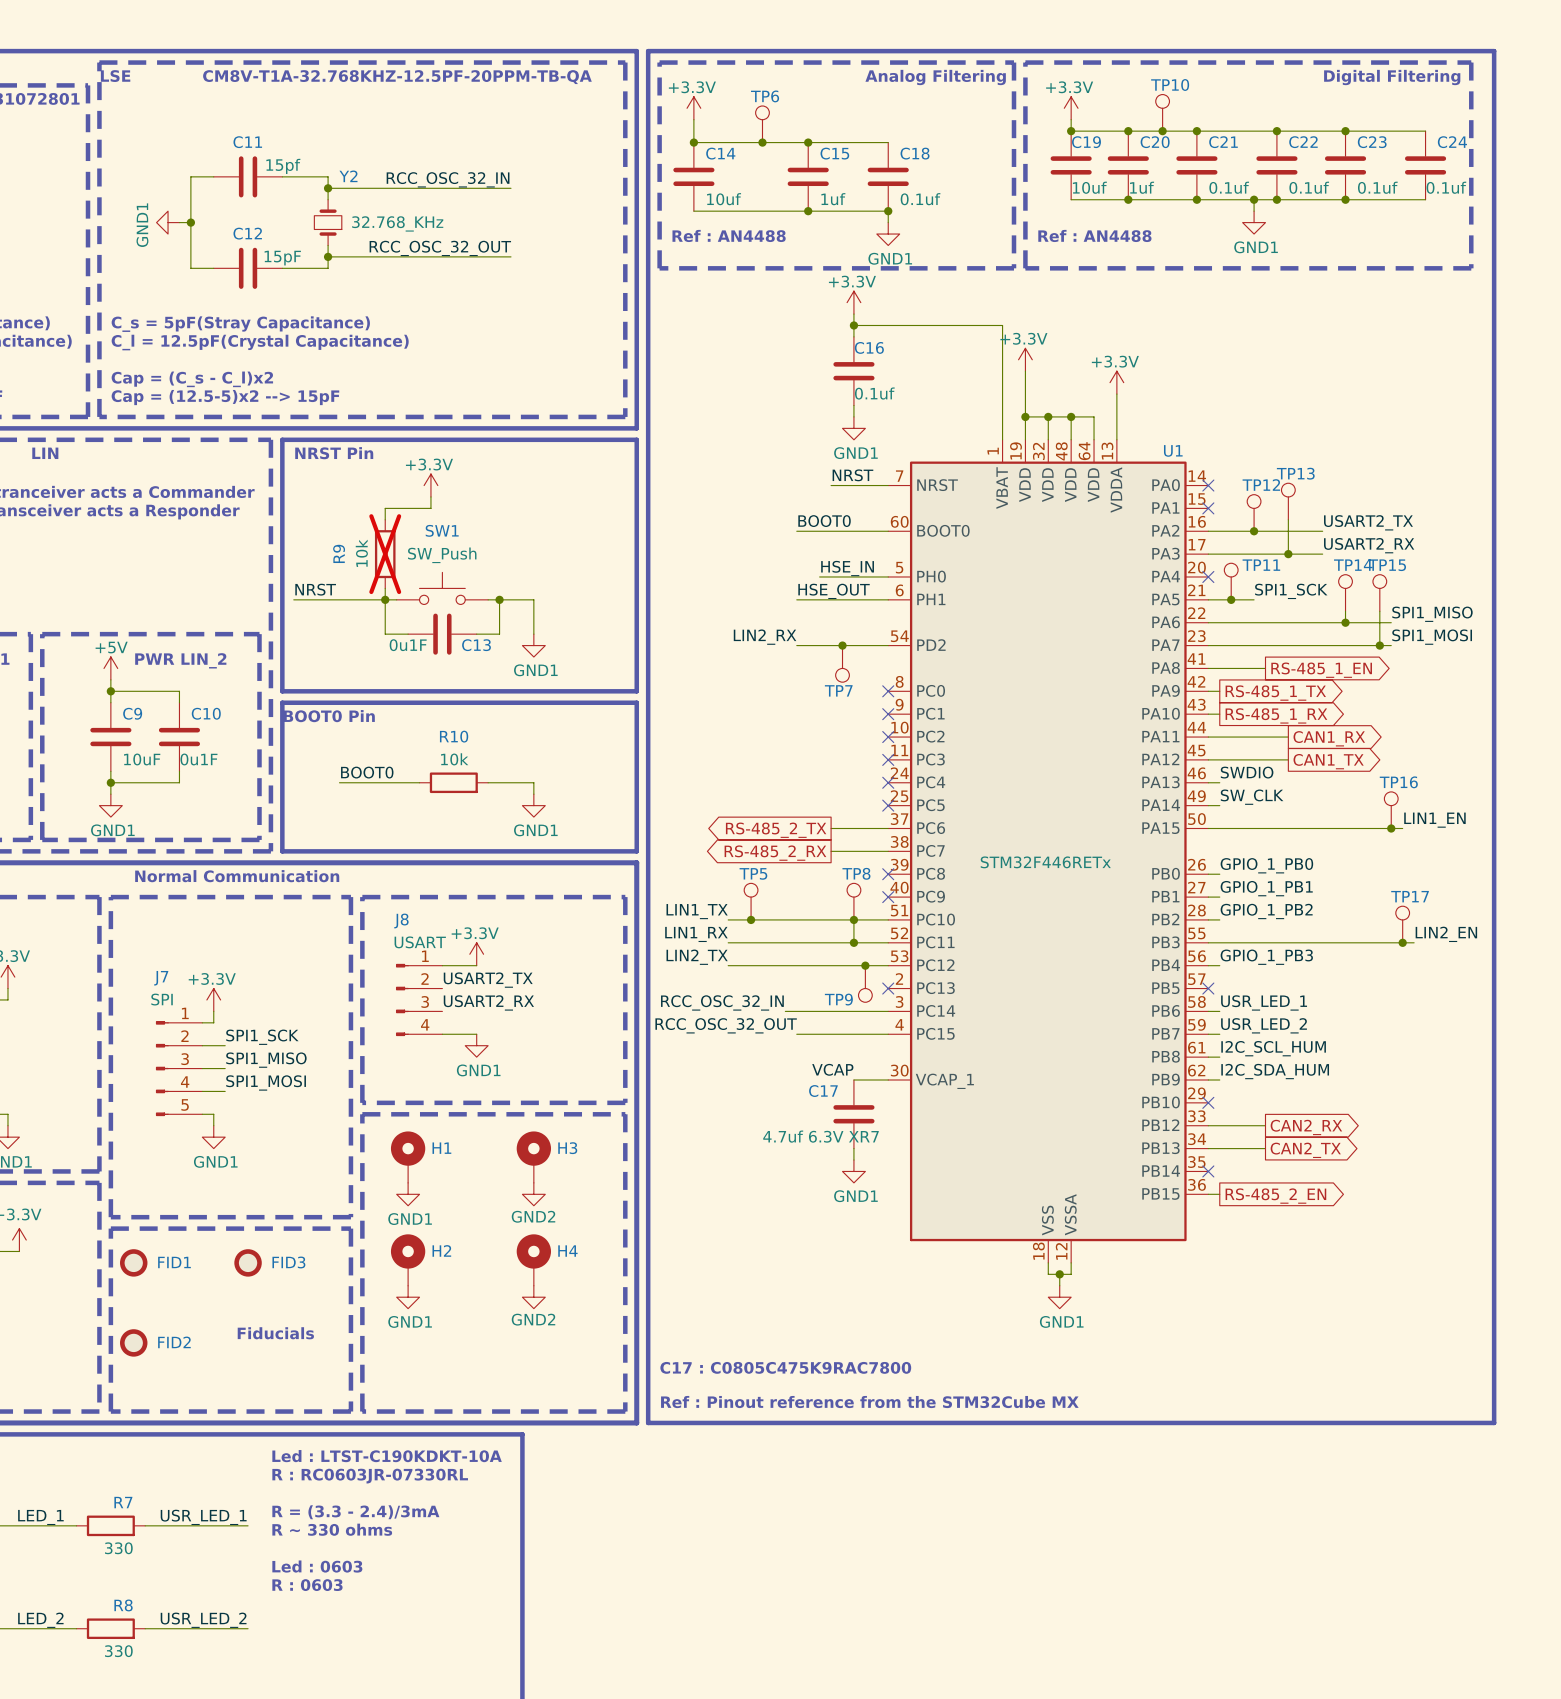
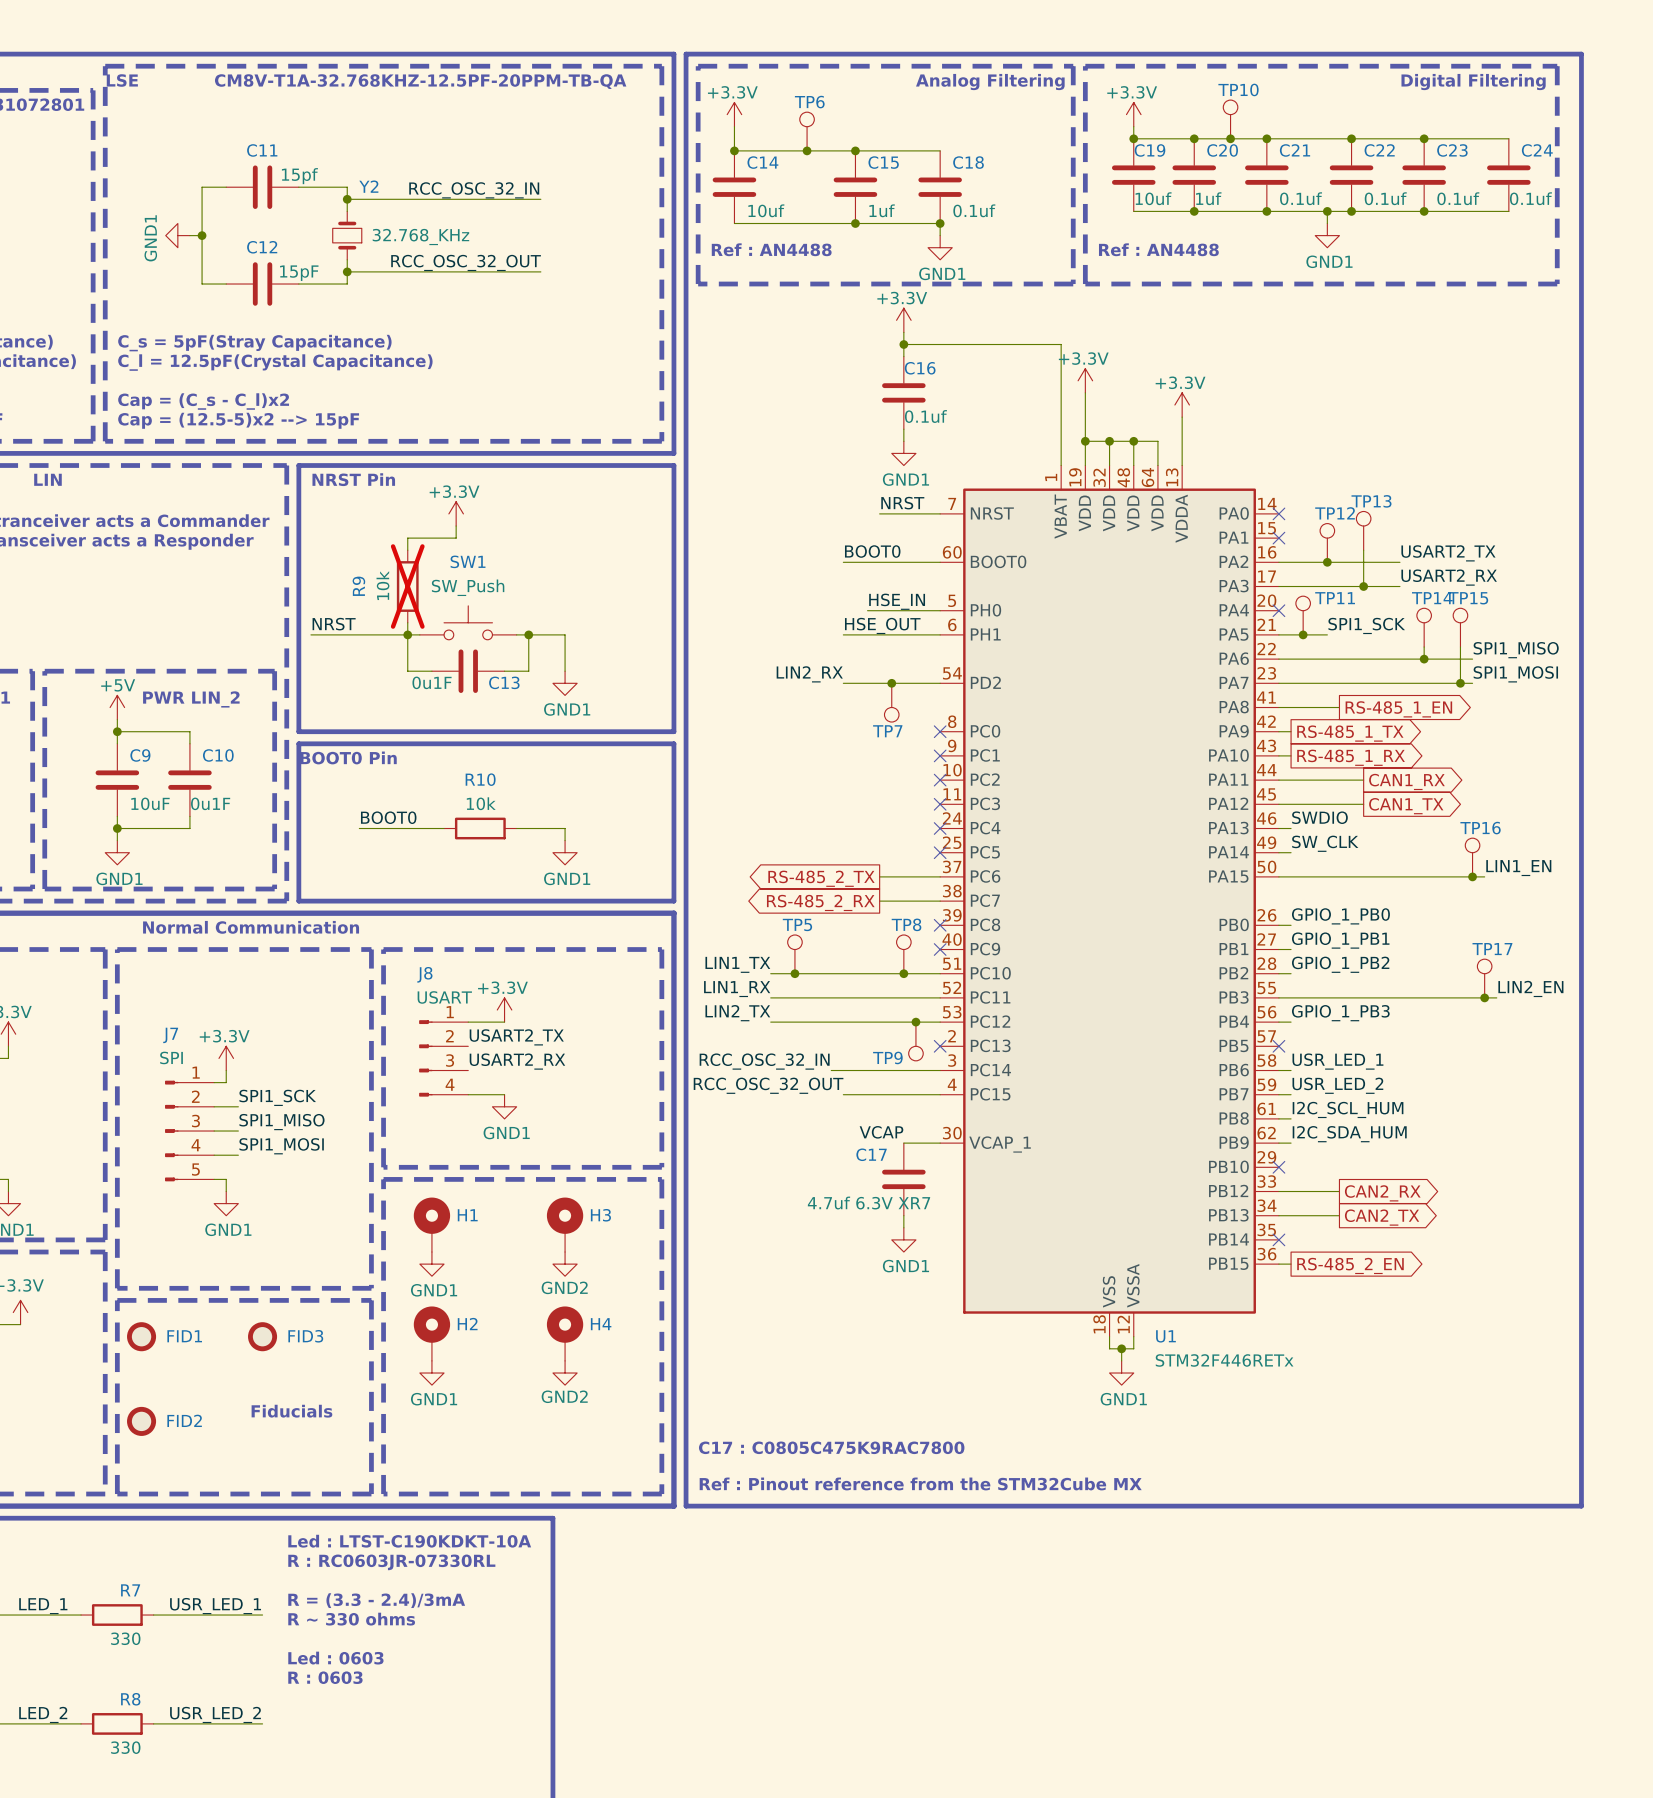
U1 name position: U1 (1173, 450) -> U1 (1165, 1336)
U1 value position: STM32F446RETx (1045, 862) -> STM32F446RETx (1224, 1360)
wire: (853, 919) (853, 942) -> none
junction: (853, 942) -> none

